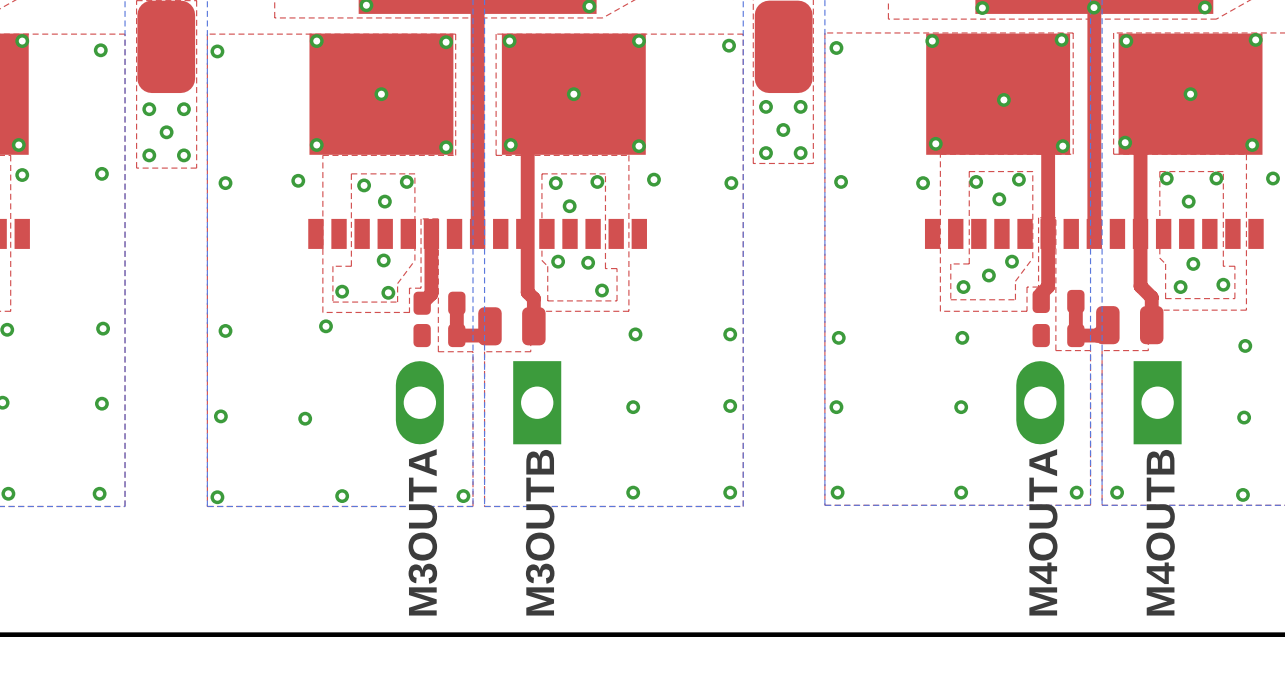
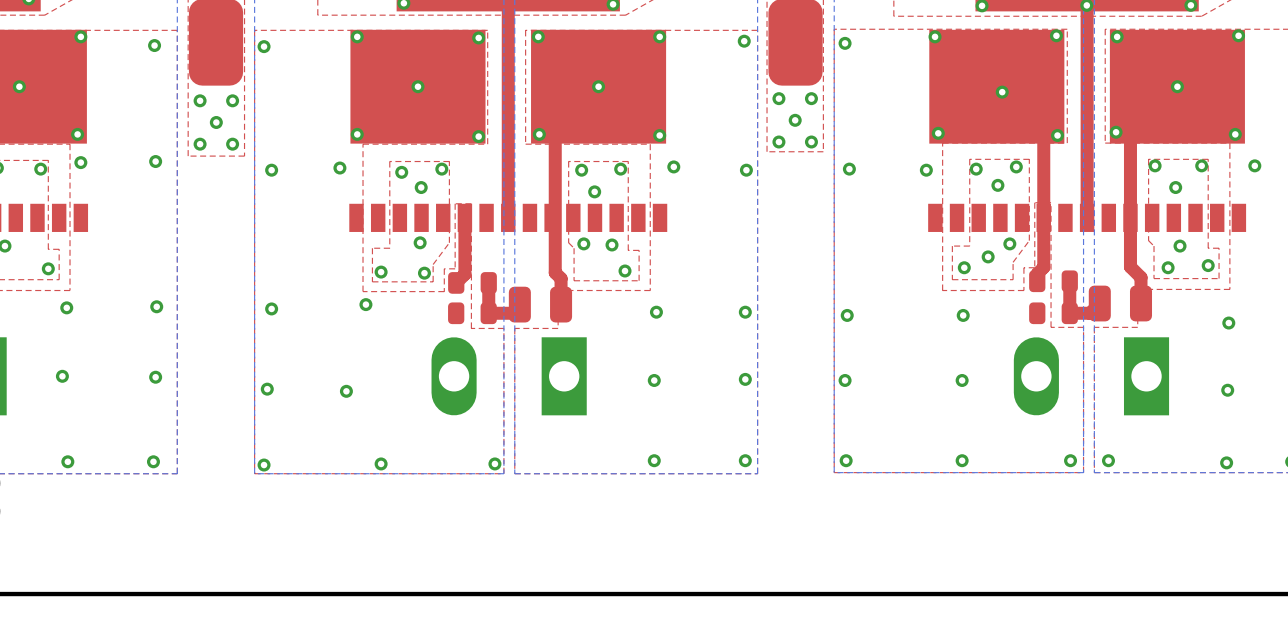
text: M3OUTA (422, 532) -> none
text: M3OUTB (540, 532) -> none
text: M4OUTA (1043, 532) -> none
text: M4OUTB (1160, 532) -> none

